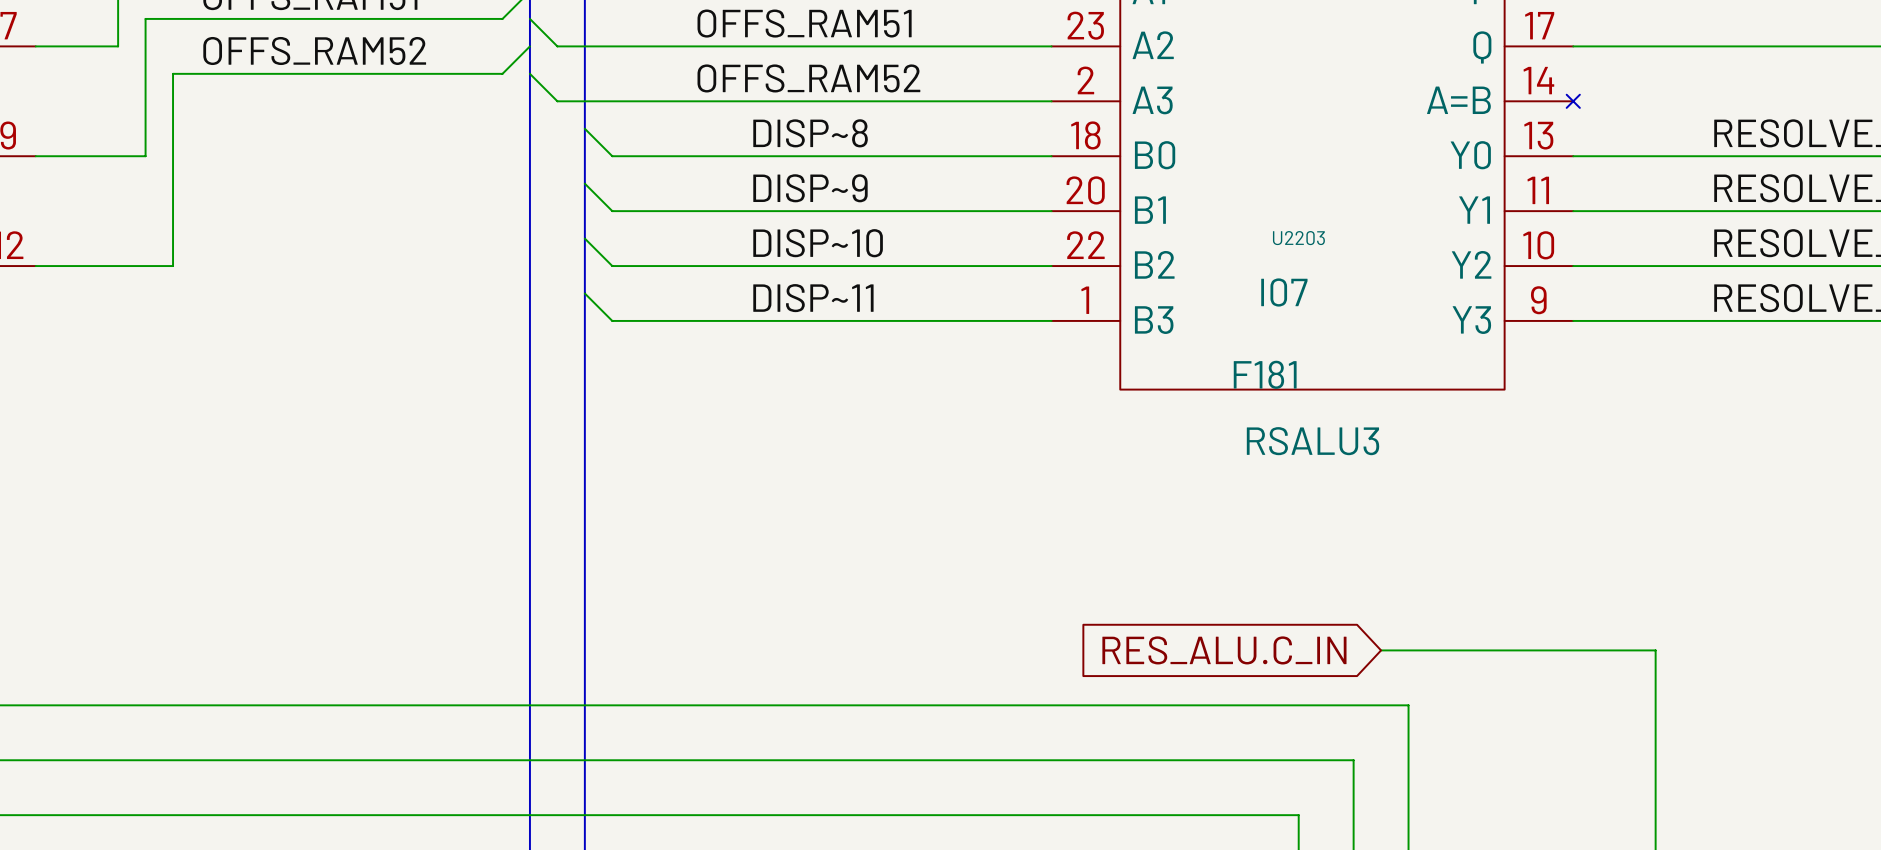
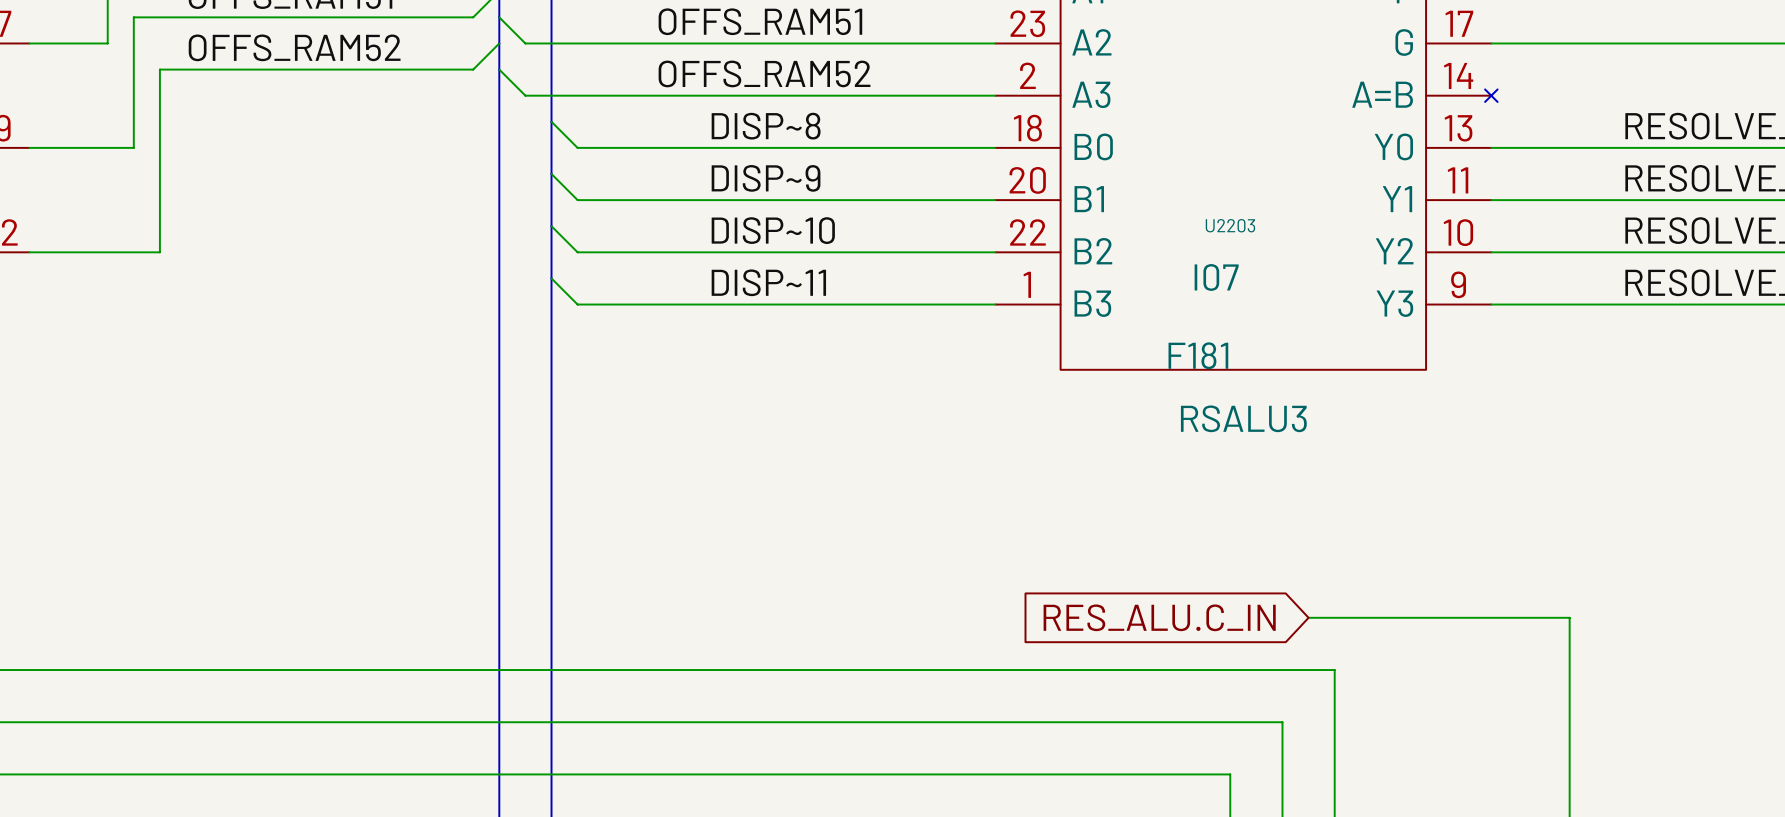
U2203 pin name: Q (1482, 47) -> G (1404, 42)

